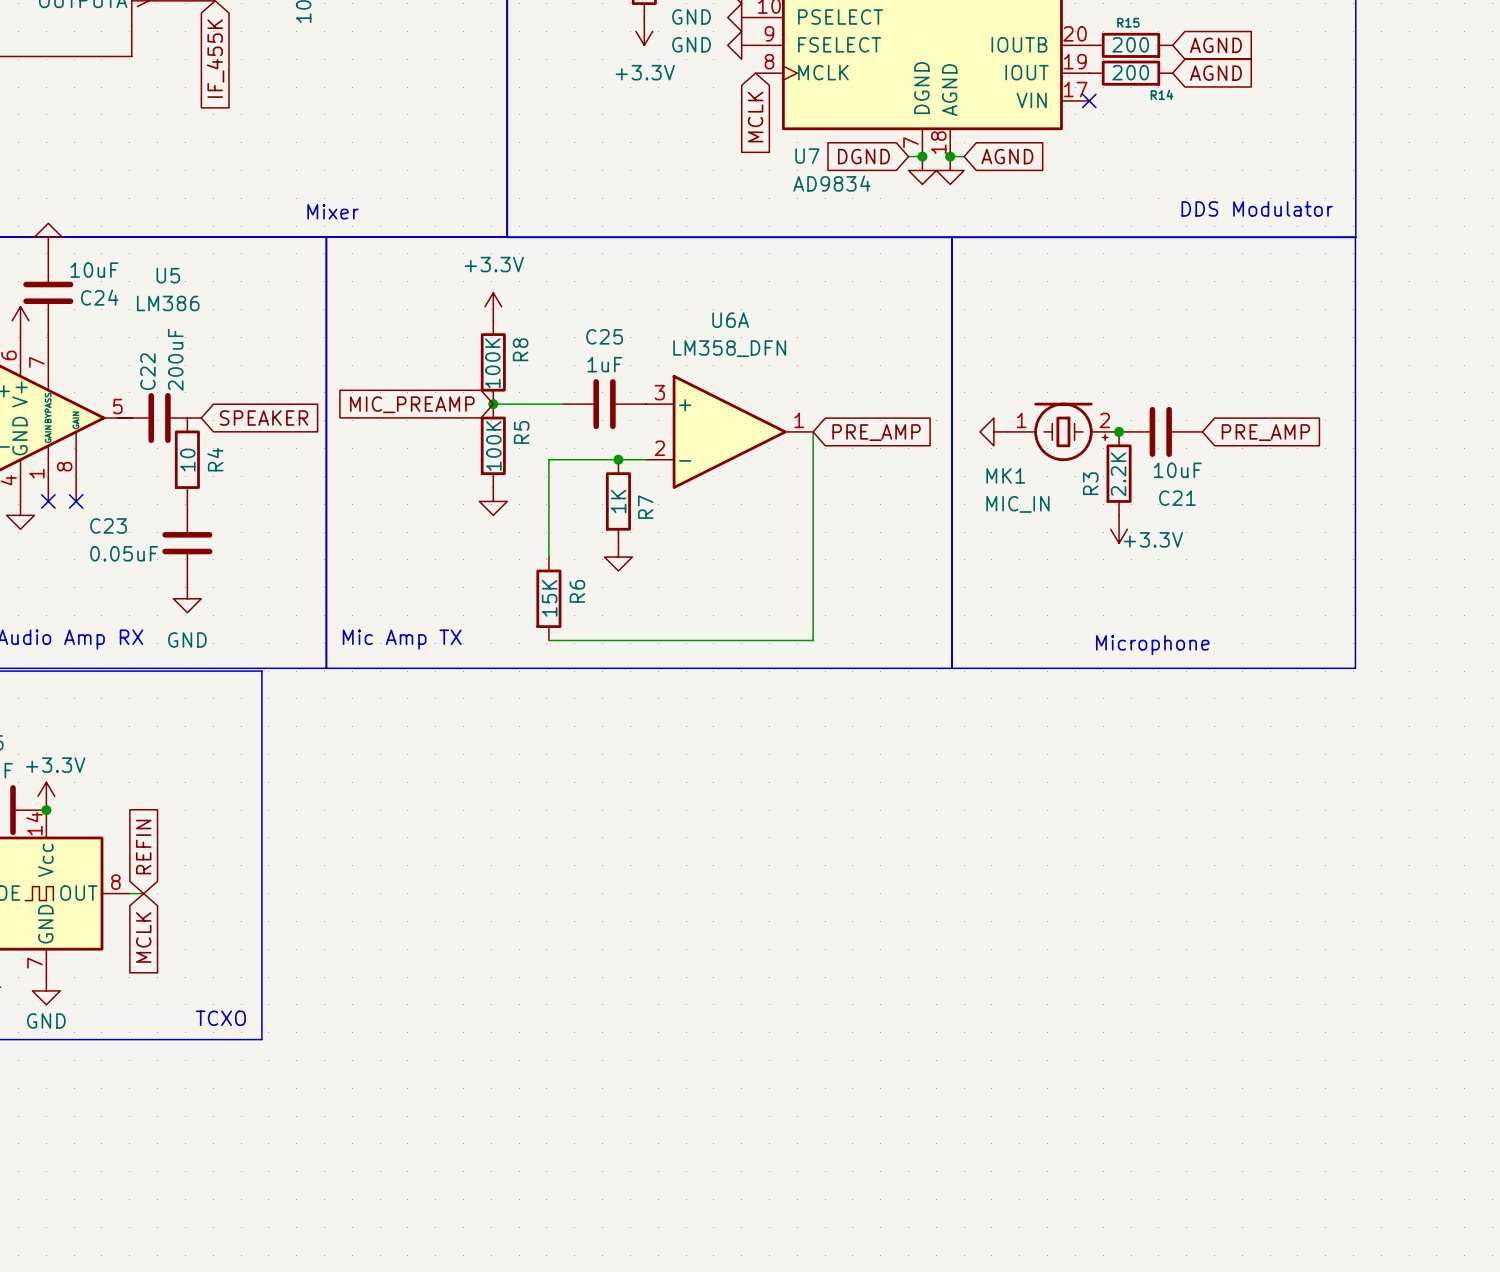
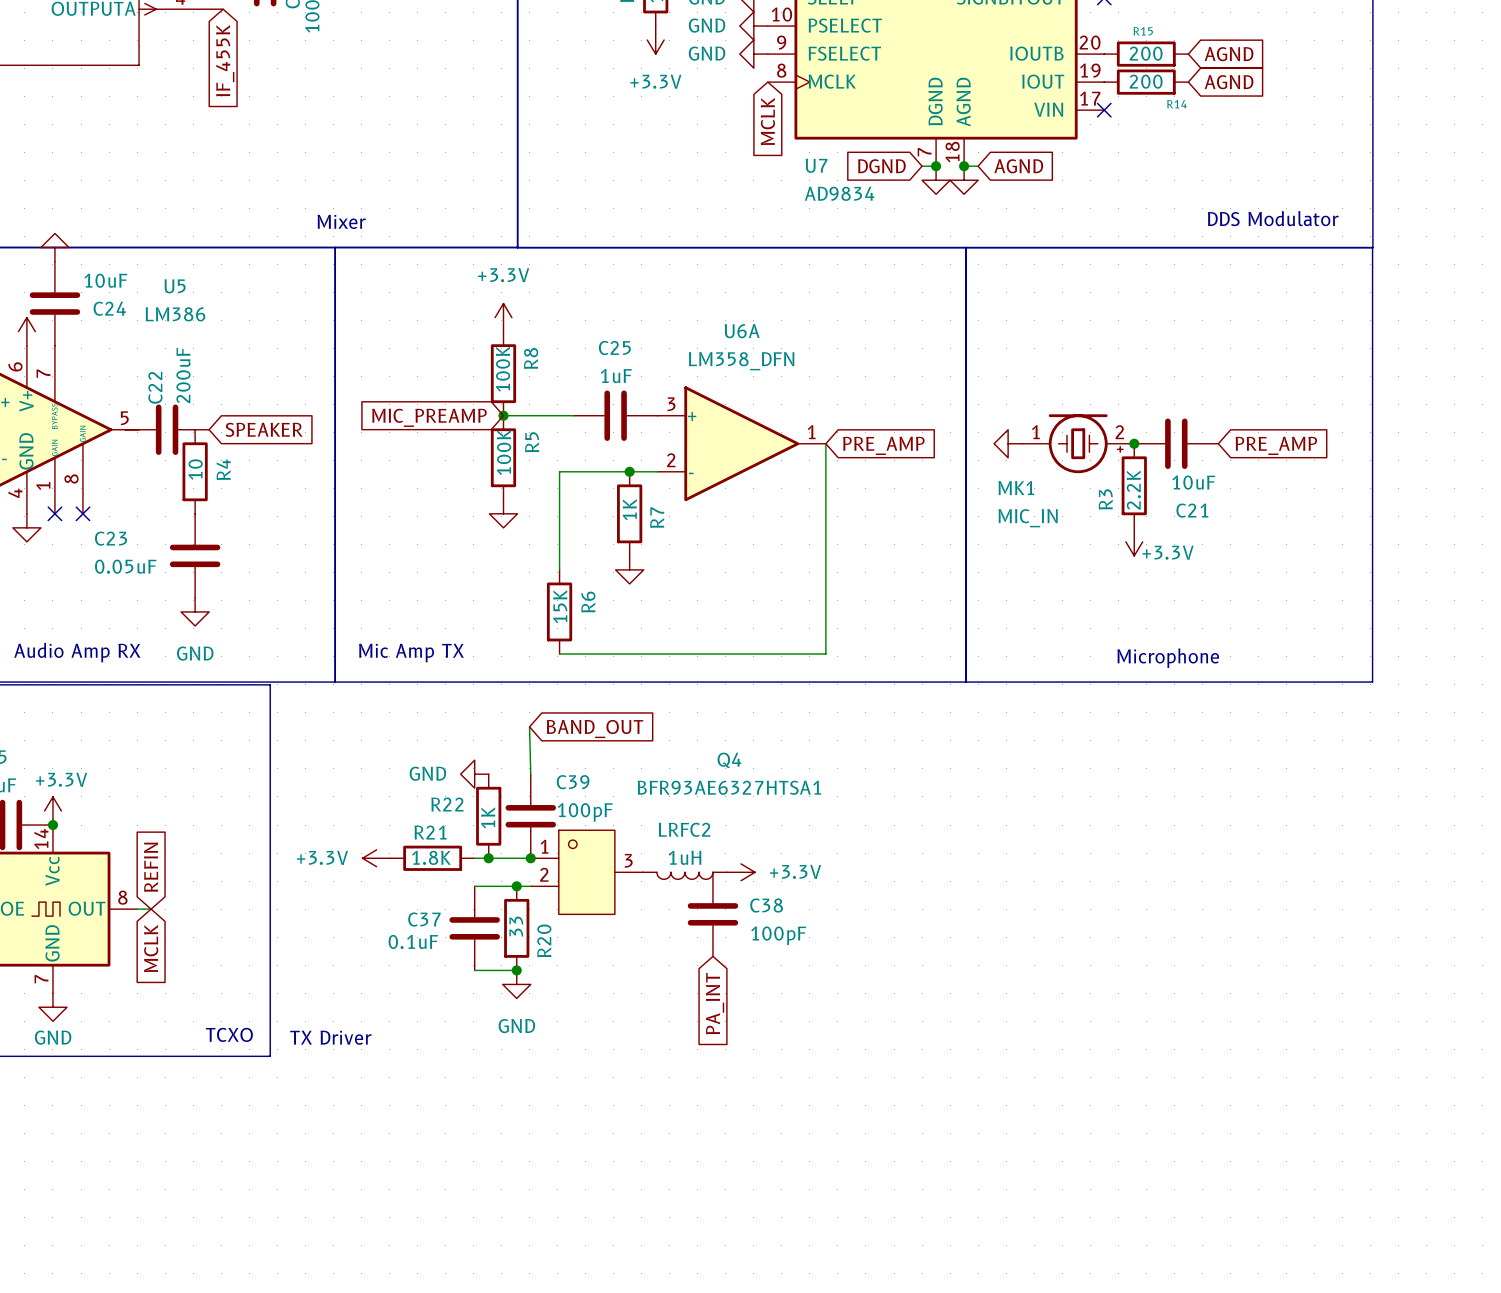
wire: none -> (529, 726) (530, 774)
global label: none -> BAND_OUT (595, 729)
power symbol: none -> GND (474, 774)
R22: none -> 1K (488, 816)
C39: none -> 100pF (530, 816)
power symbol: none -> +3.3V (376, 858)
R21: none -> 1.8K (432, 858)
wire: none -> (474, 858) (530, 858)
junction: none -> (488, 858)
junction: none -> (530, 858)
Q4: none -> BFR93AE6327HTSA1 (586, 872)
power symbol: none -> +3.3V (741, 872)
LRFC2: none -> 1uH (684, 875)
wire: none -> (474, 886) (530, 886)
junction: none -> (516, 886)
C38: none -> 100pF (712, 914)
C37: none -> 0.1uF (474, 928)
R20: none -> 33 (516, 928)
wire: none -> (474, 970) (516, 970)
junction: none -> (516, 970)
power symbol: none -> GND (516, 984)
global label: none -> PA_INT (715, 1003)
text: none -> TX Driver (330, 1037)

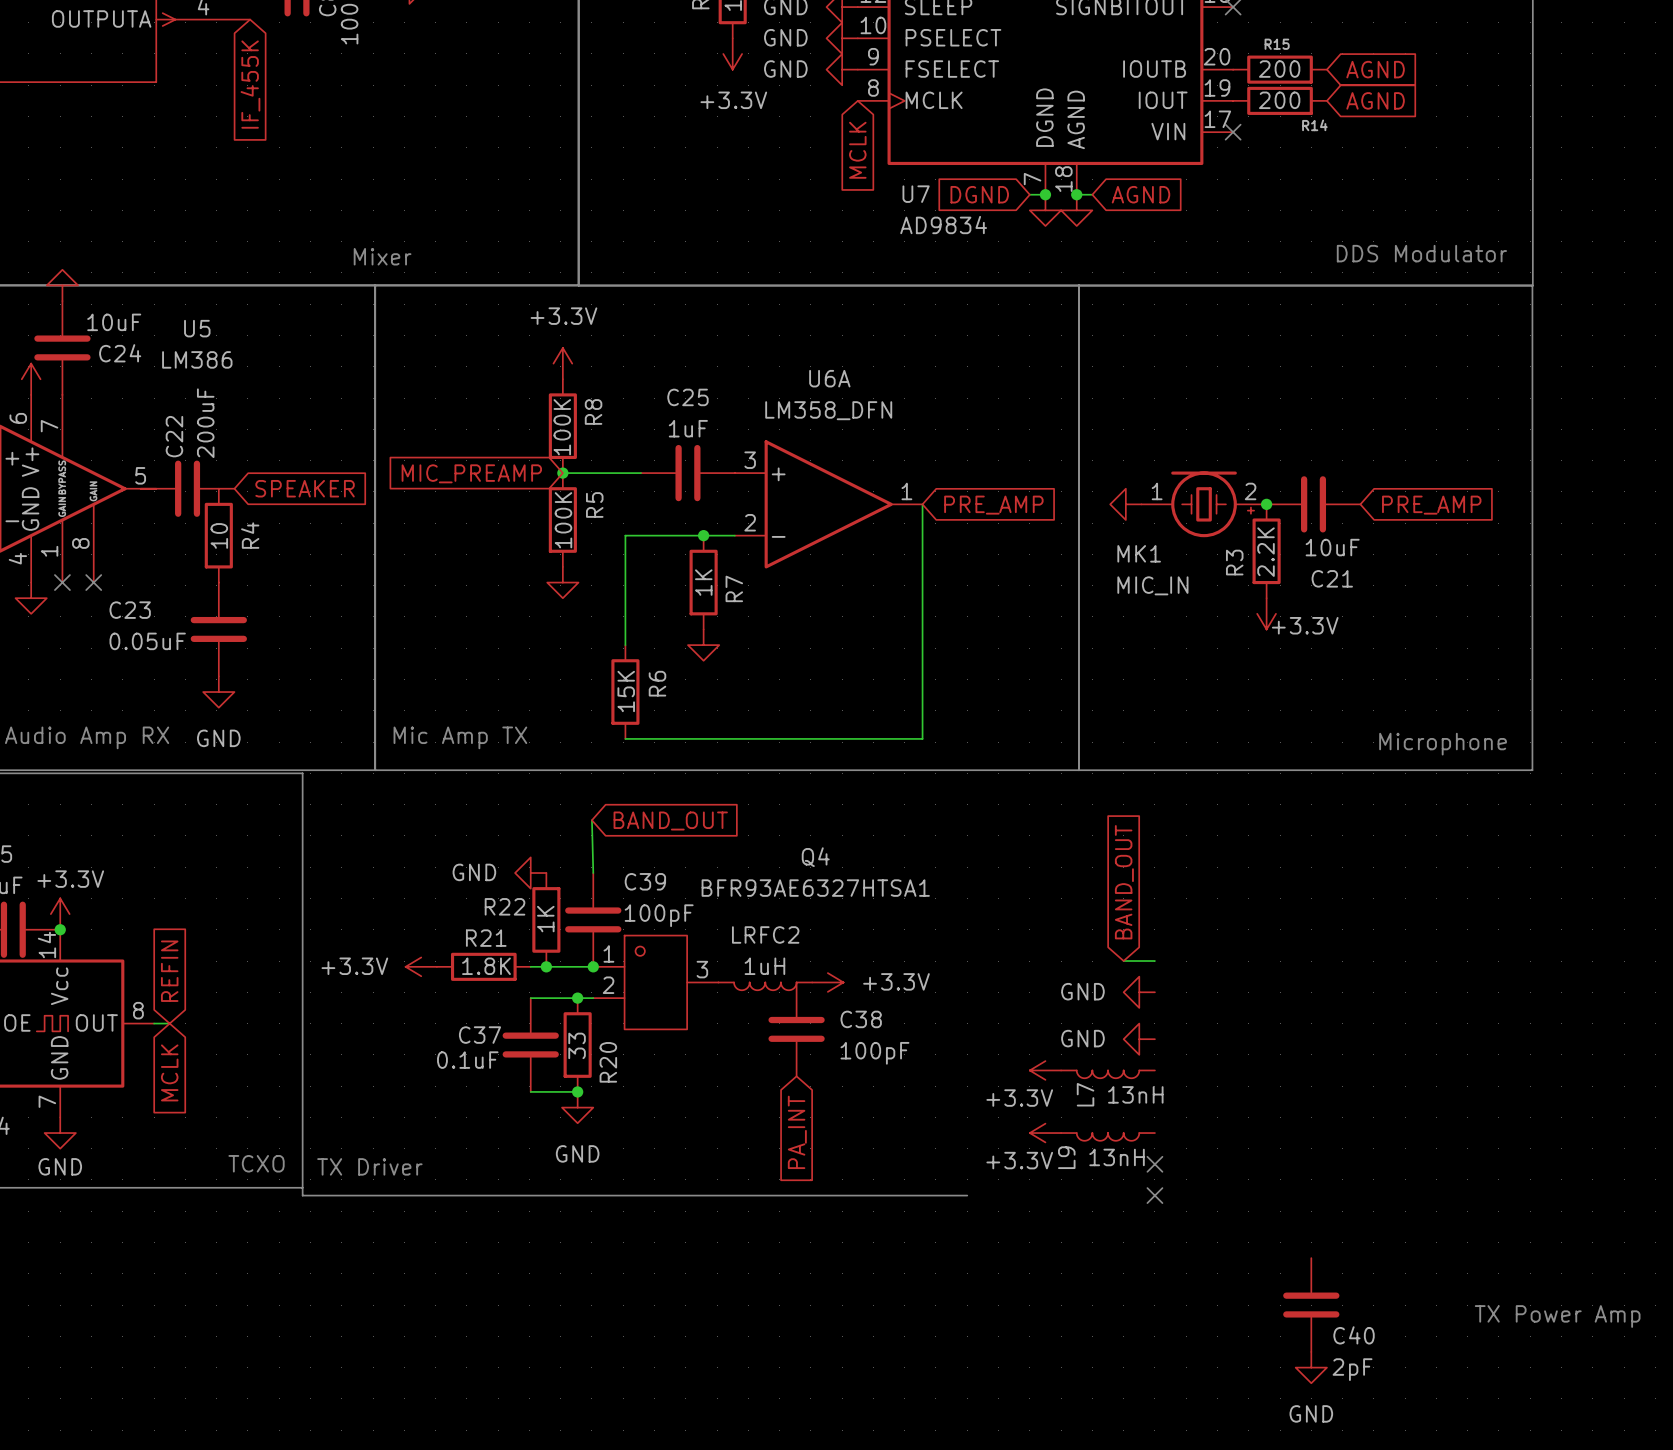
text position: Microphone (1168, 658) -> Microphone (1443, 744)
global label: none -> BAND_OUT (1124, 882)
wire: none -> (1123, 961) (1154, 961)
power symbol: none -> GND (1139, 992)
power symbol: none -> GND (1139, 1039)
power symbol: none -> +3.3V (1045, 1070)
L7: none -> 13nH (1108, 1074)
power symbol: none -> +3.3V (1045, 1133)
L9: none -> 13nH (1108, 1136)
no-connect mark: none -> (1154, 1164)
line: none -> (302, 1187) (302, 1195) (967, 1195)
no-connect mark: none -> (1154, 1195)
C40: none -> 2pF (1311, 1305)
text: none -> TX Power Amp (1557, 1316)
power symbol: none -> GND (1311, 1367)

